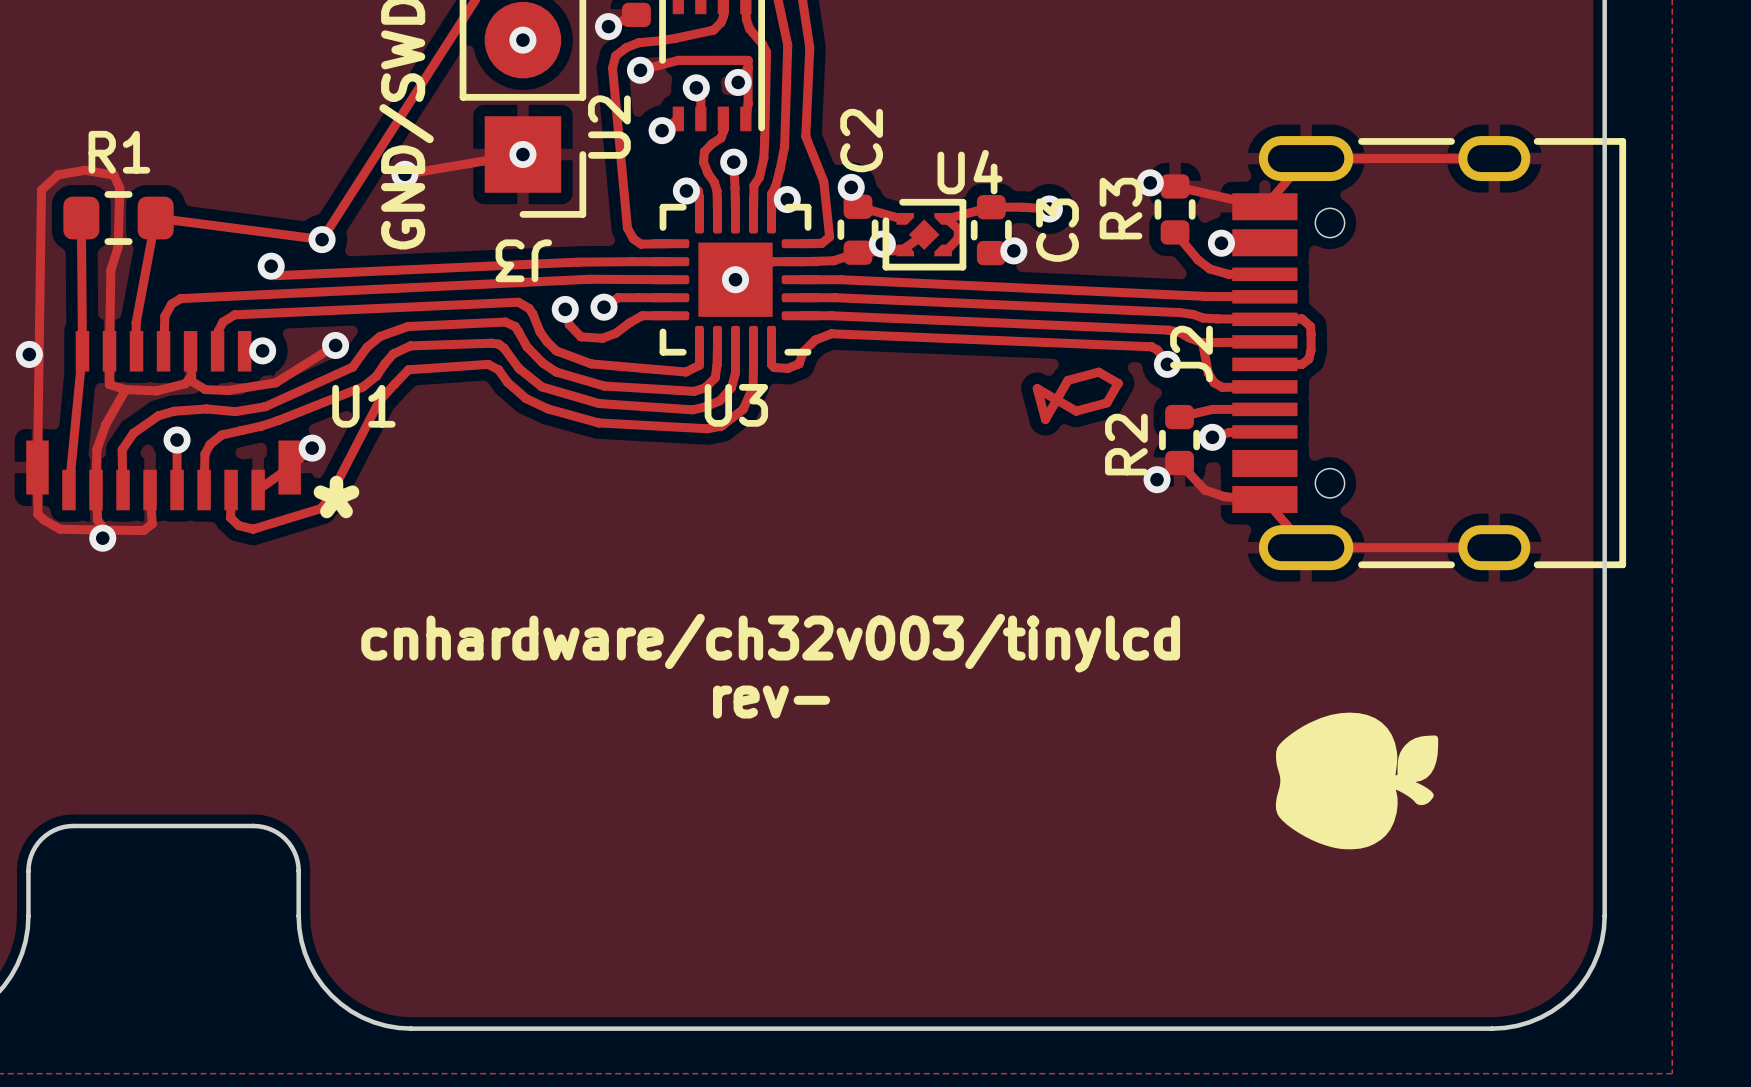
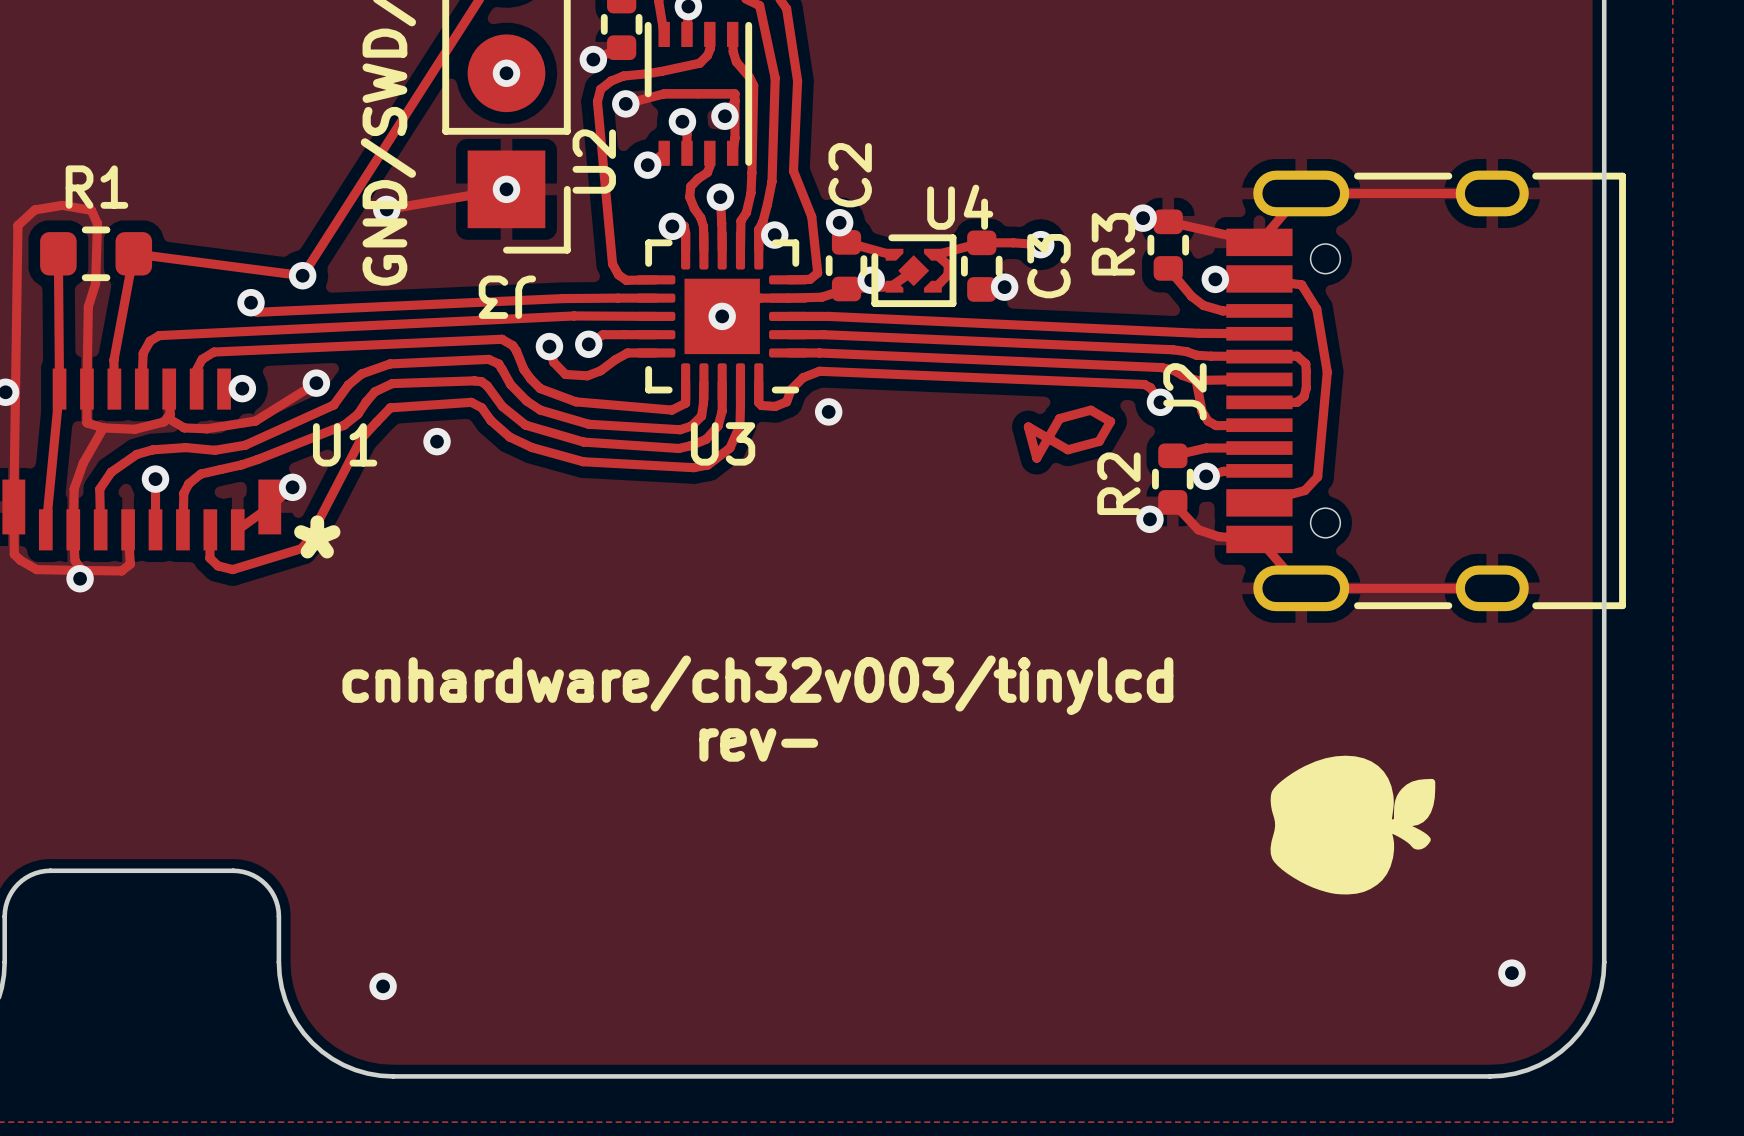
track: none -> (1259, 278) (1301, 284) (1316, 309) (1327, 372) (1317, 476) (1304, 490) (1259, 502)
via: none -> (828, 411)
via: none -> (437, 441)
via: none -> (1511, 973)
via: none -> (383, 986)

